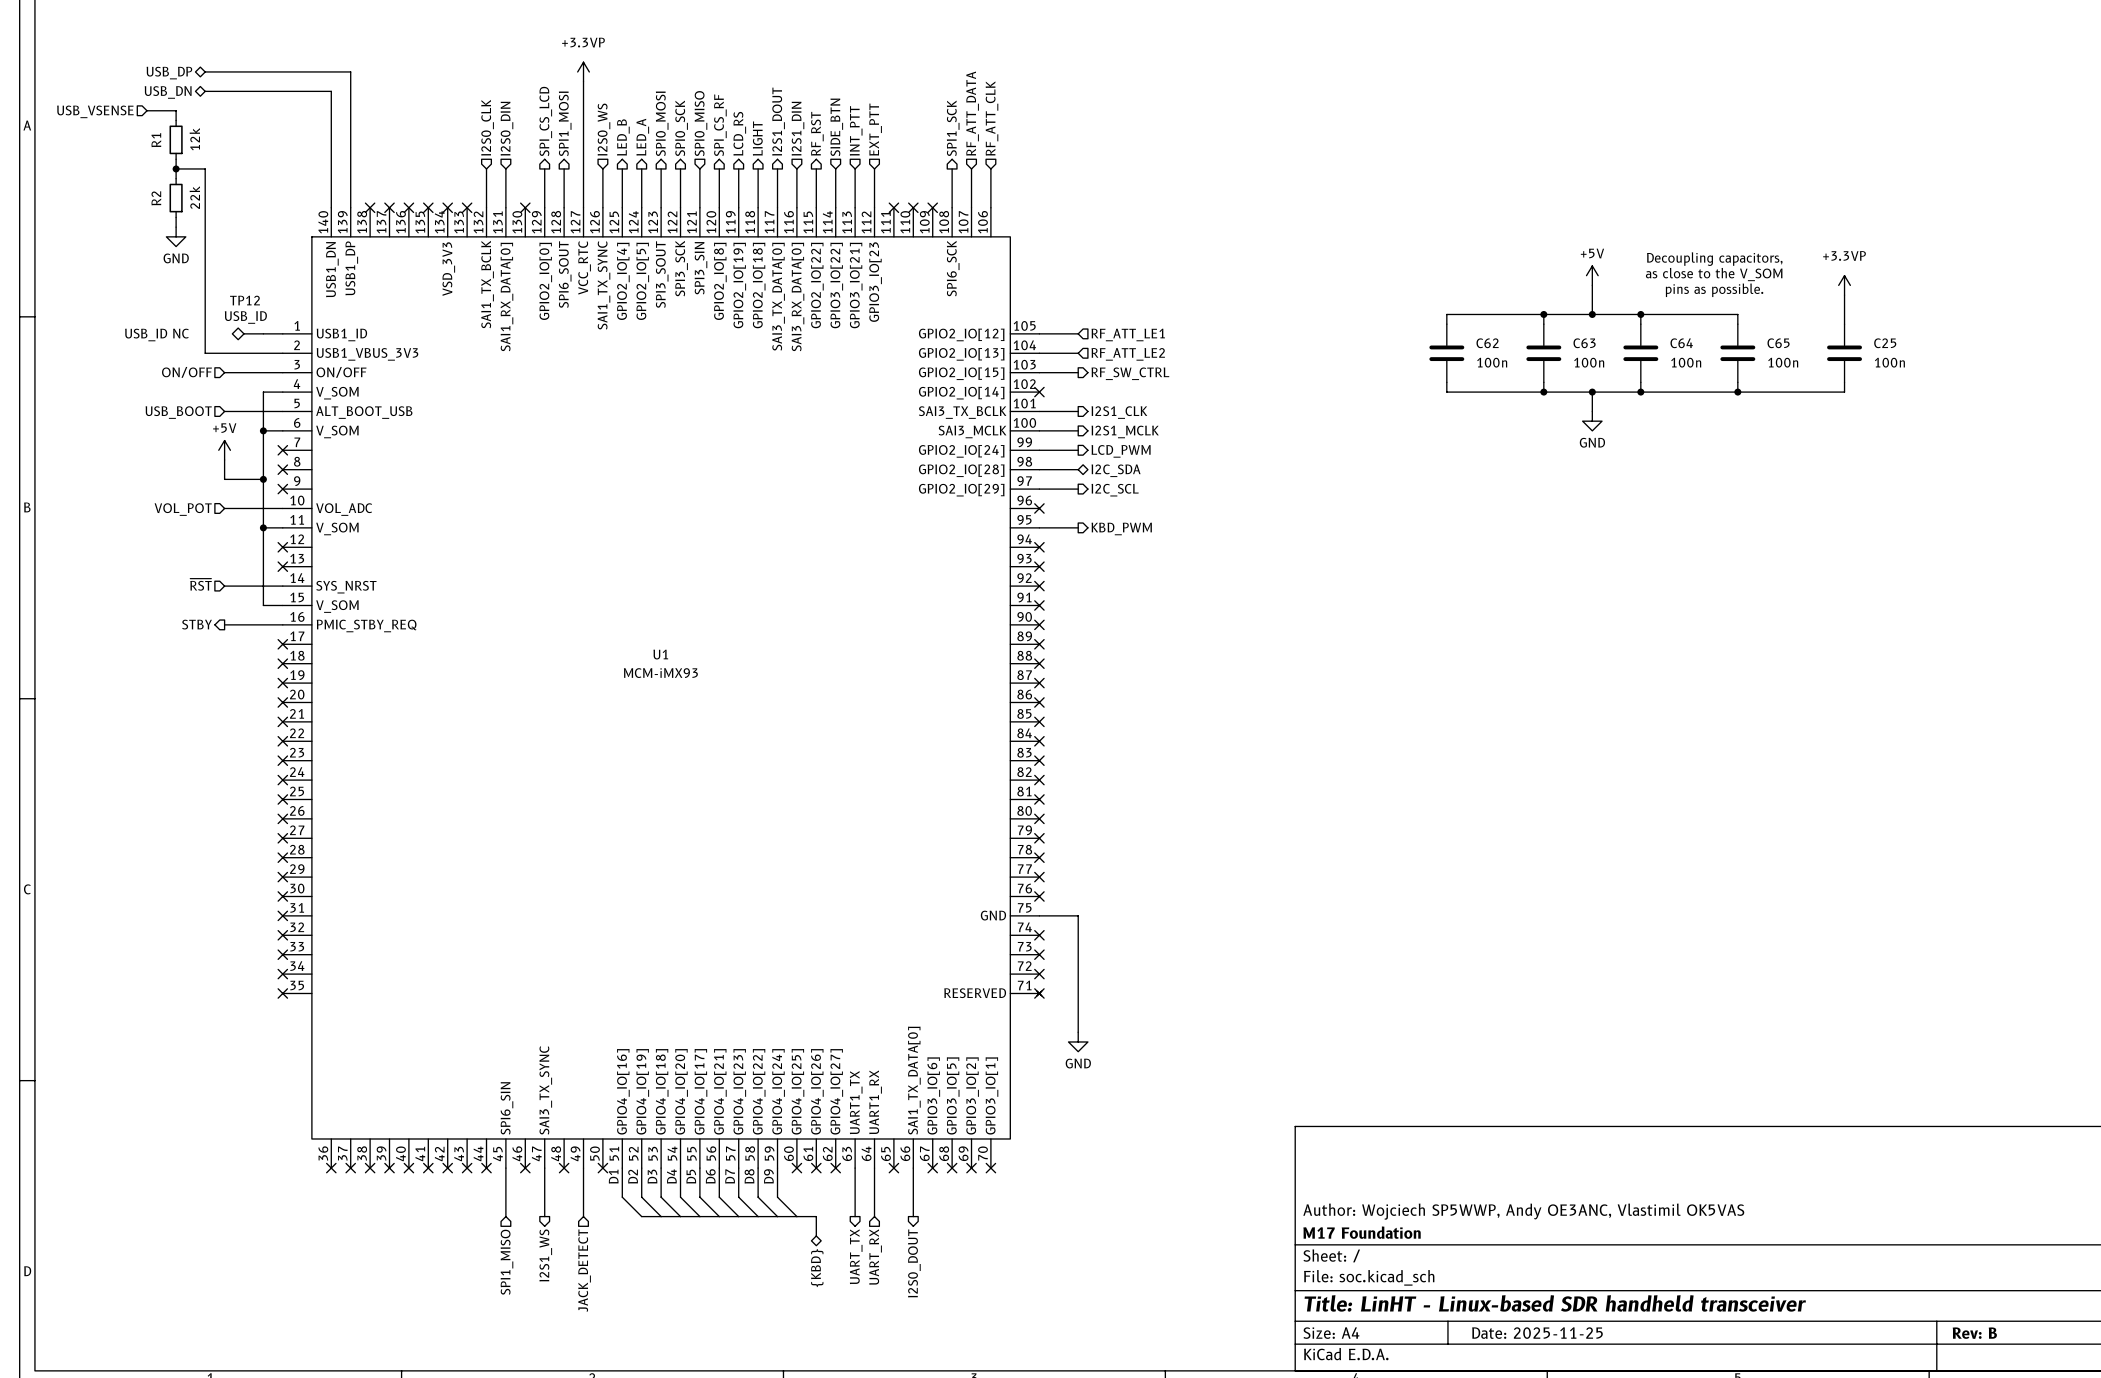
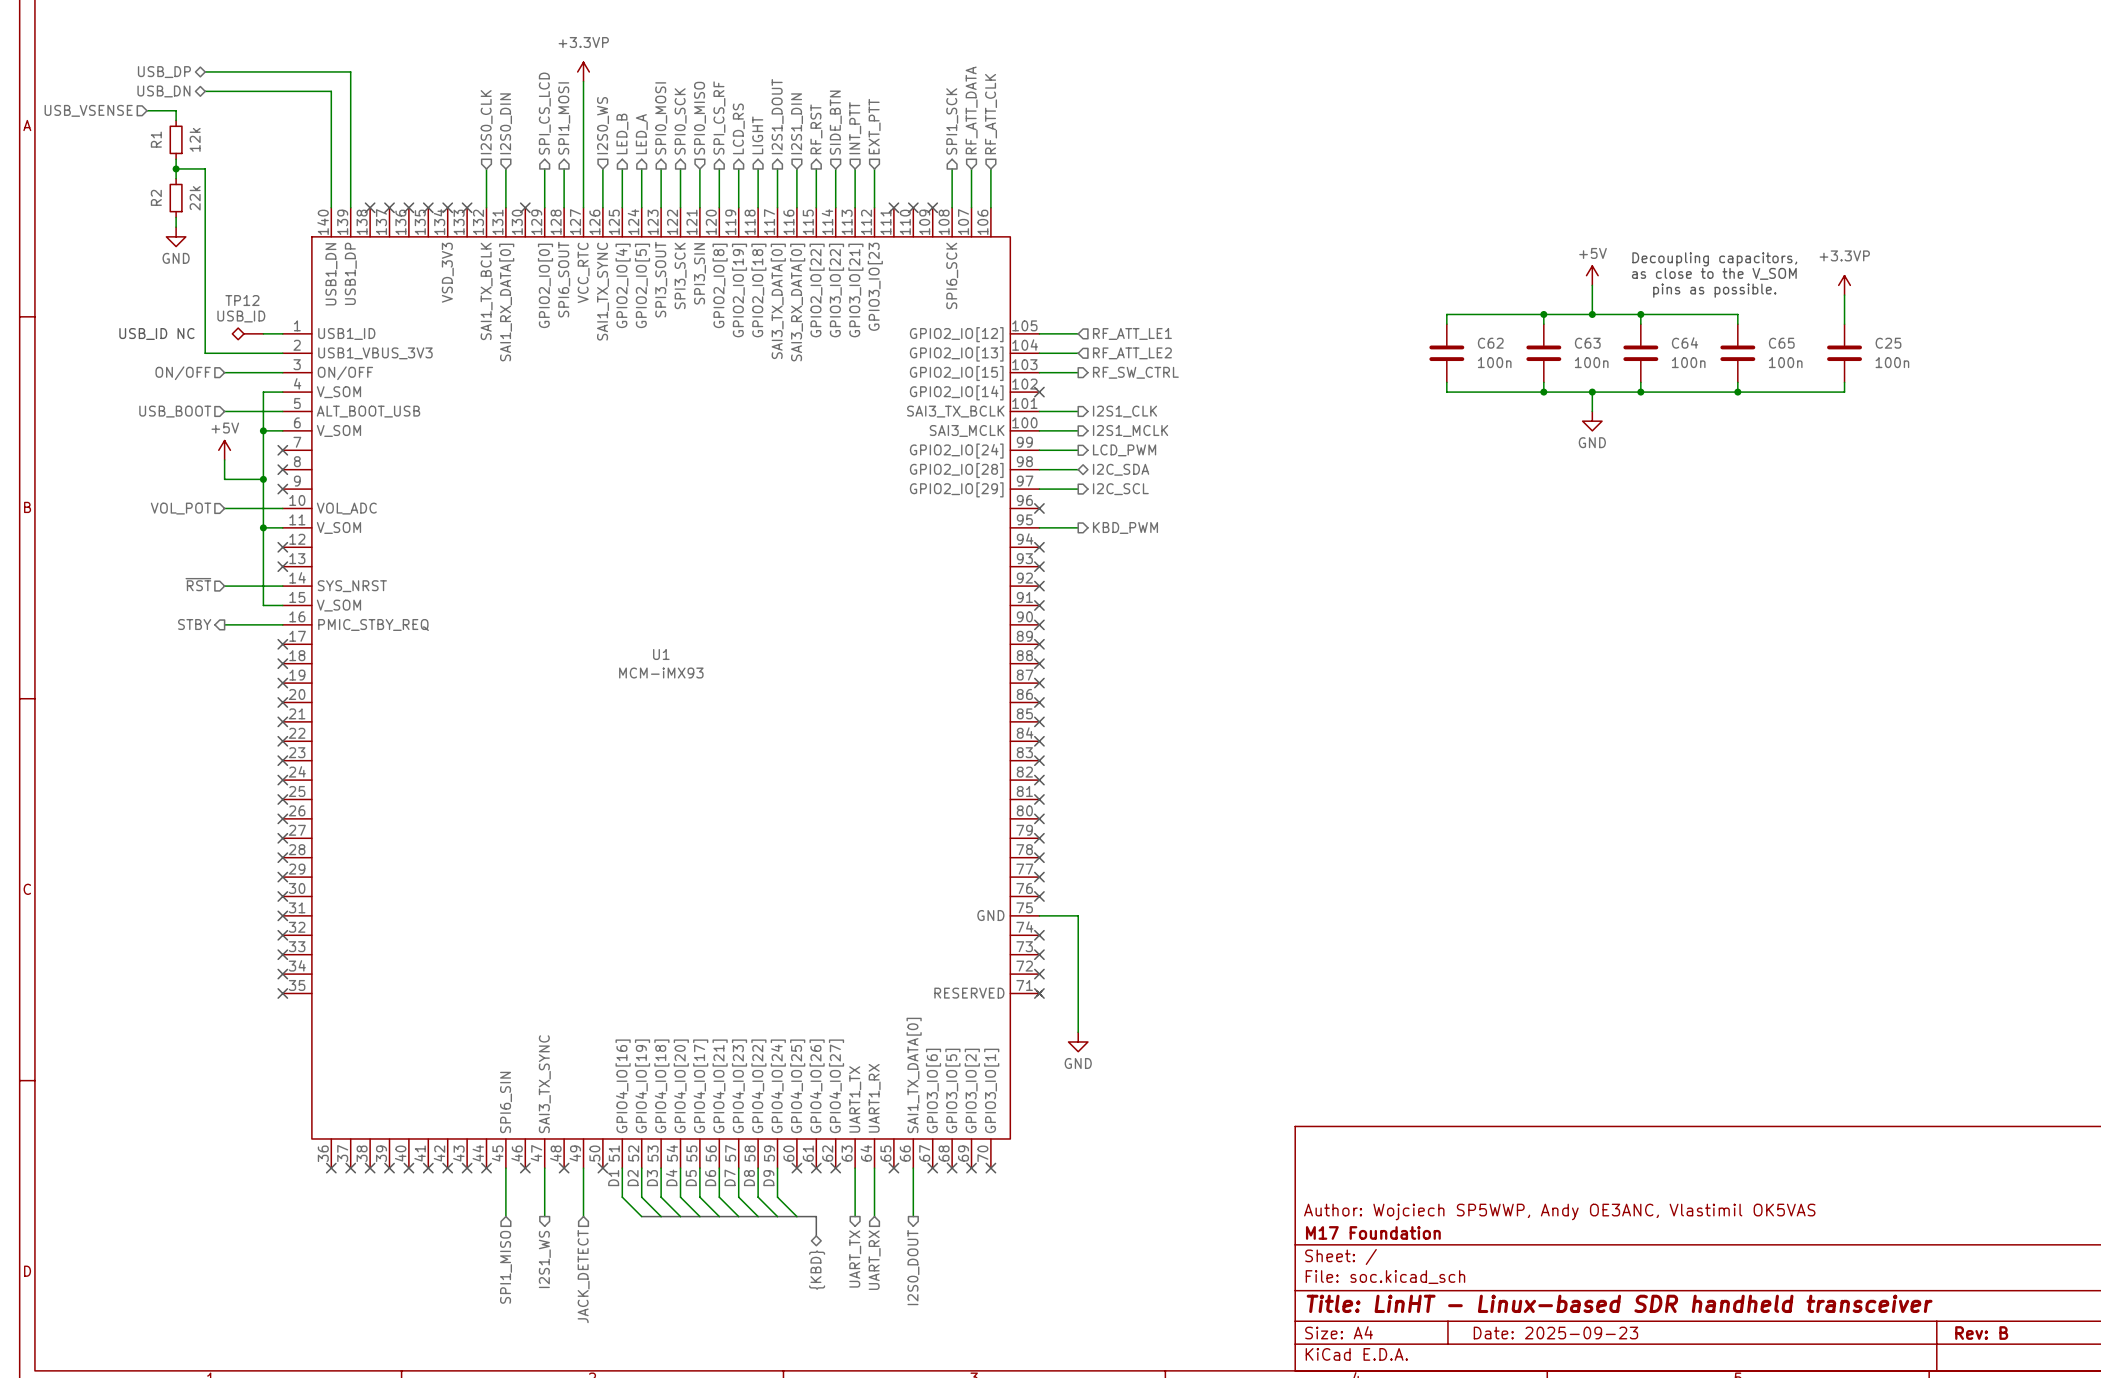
title block: Date: 2025-11-25 (1537, 1333) -> Date: 2025-09-23 (1555, 1333)

